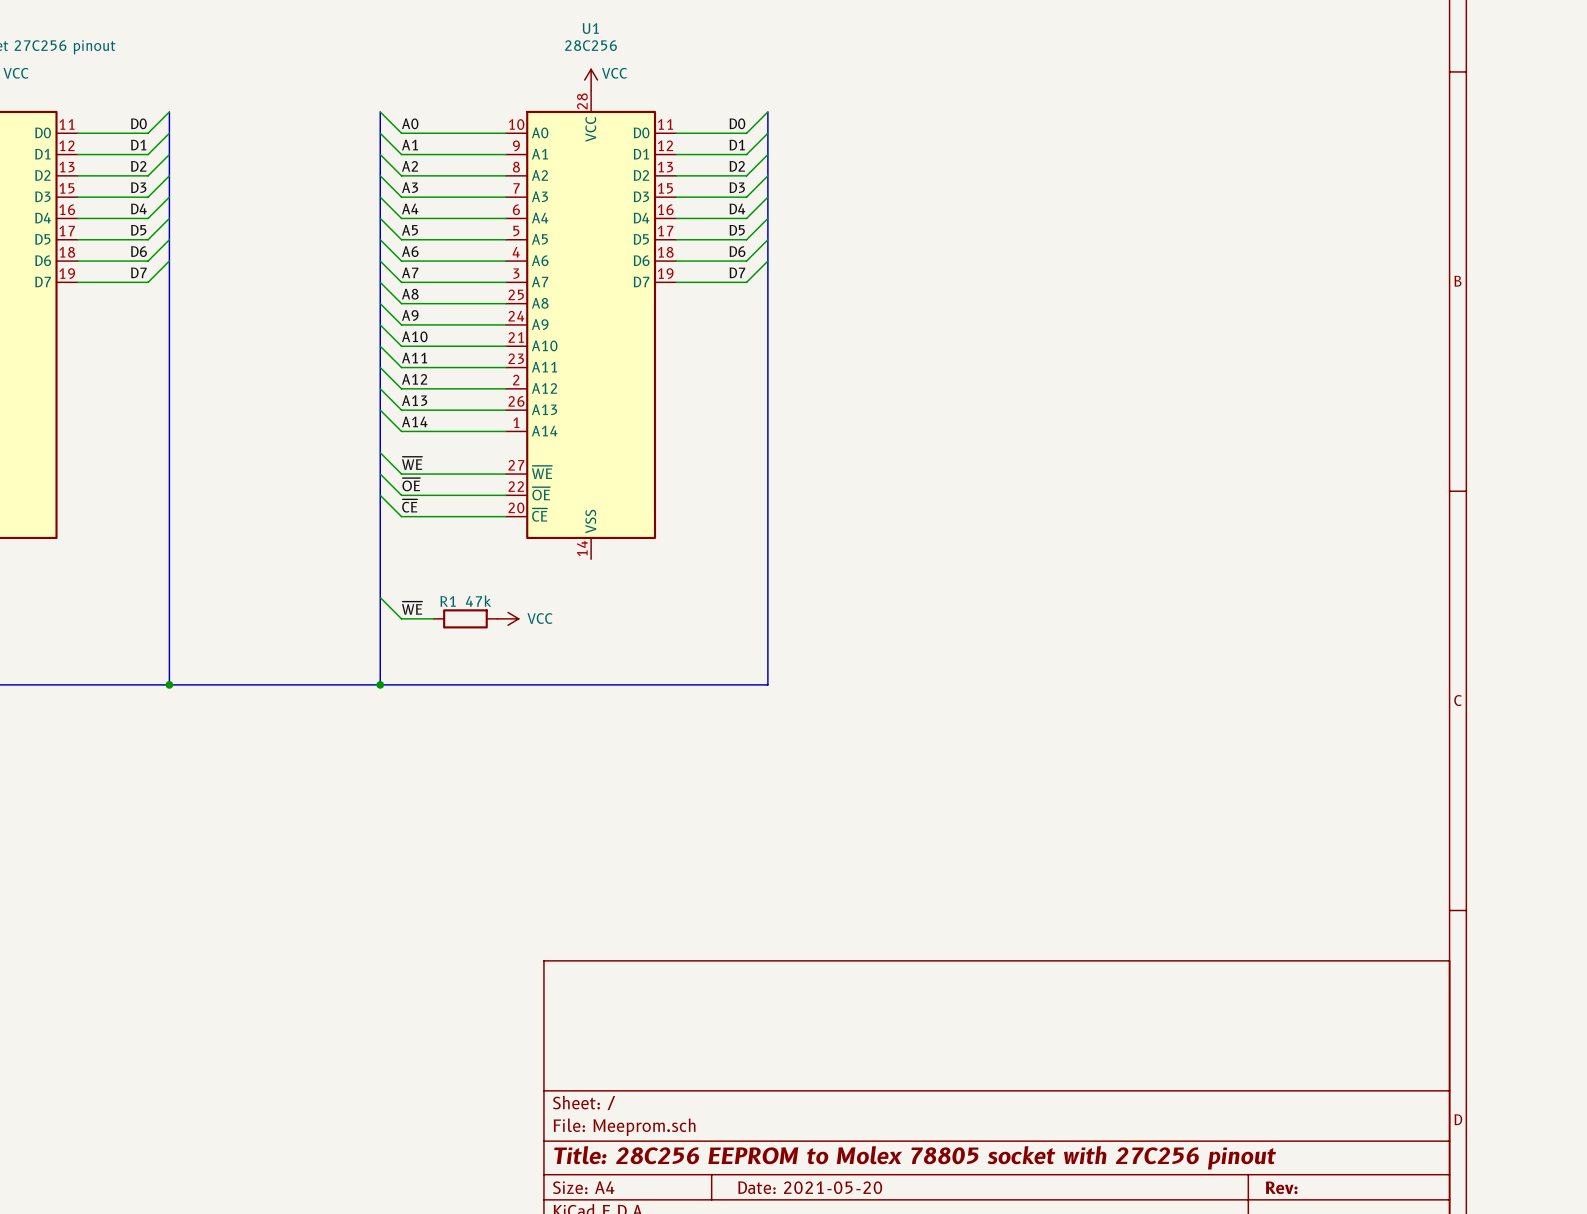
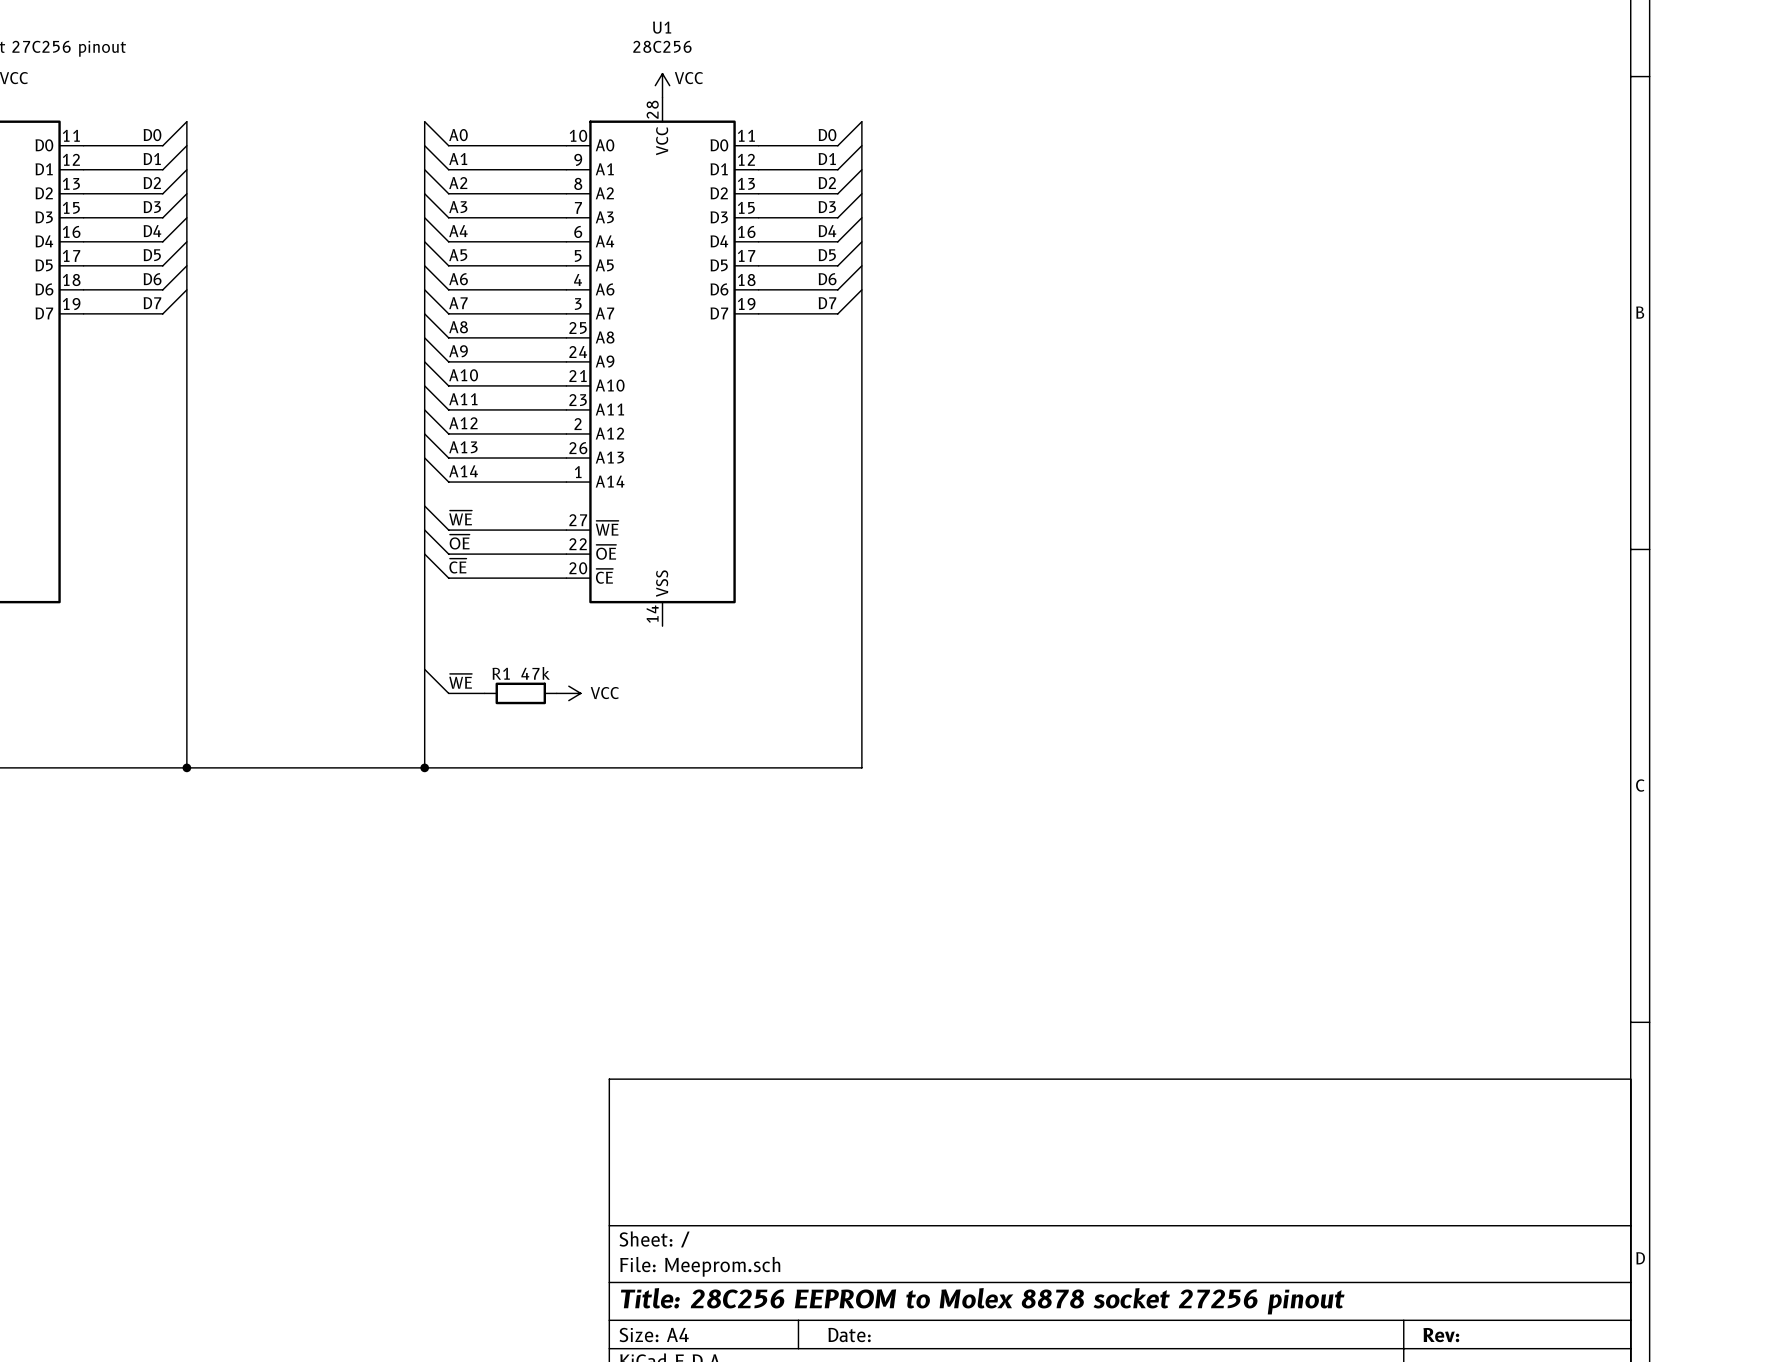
title block: Title: 28C256 EEPROM to Molex 78805 socket with 27C256 pinout (915, 1157) -> Title: 28C256 EEPROM to Molex 8878 socket 27256 pinout (982, 1301)
title block: Date: 2021-05-20 (810, 1187) -> Date: (849, 1335)

